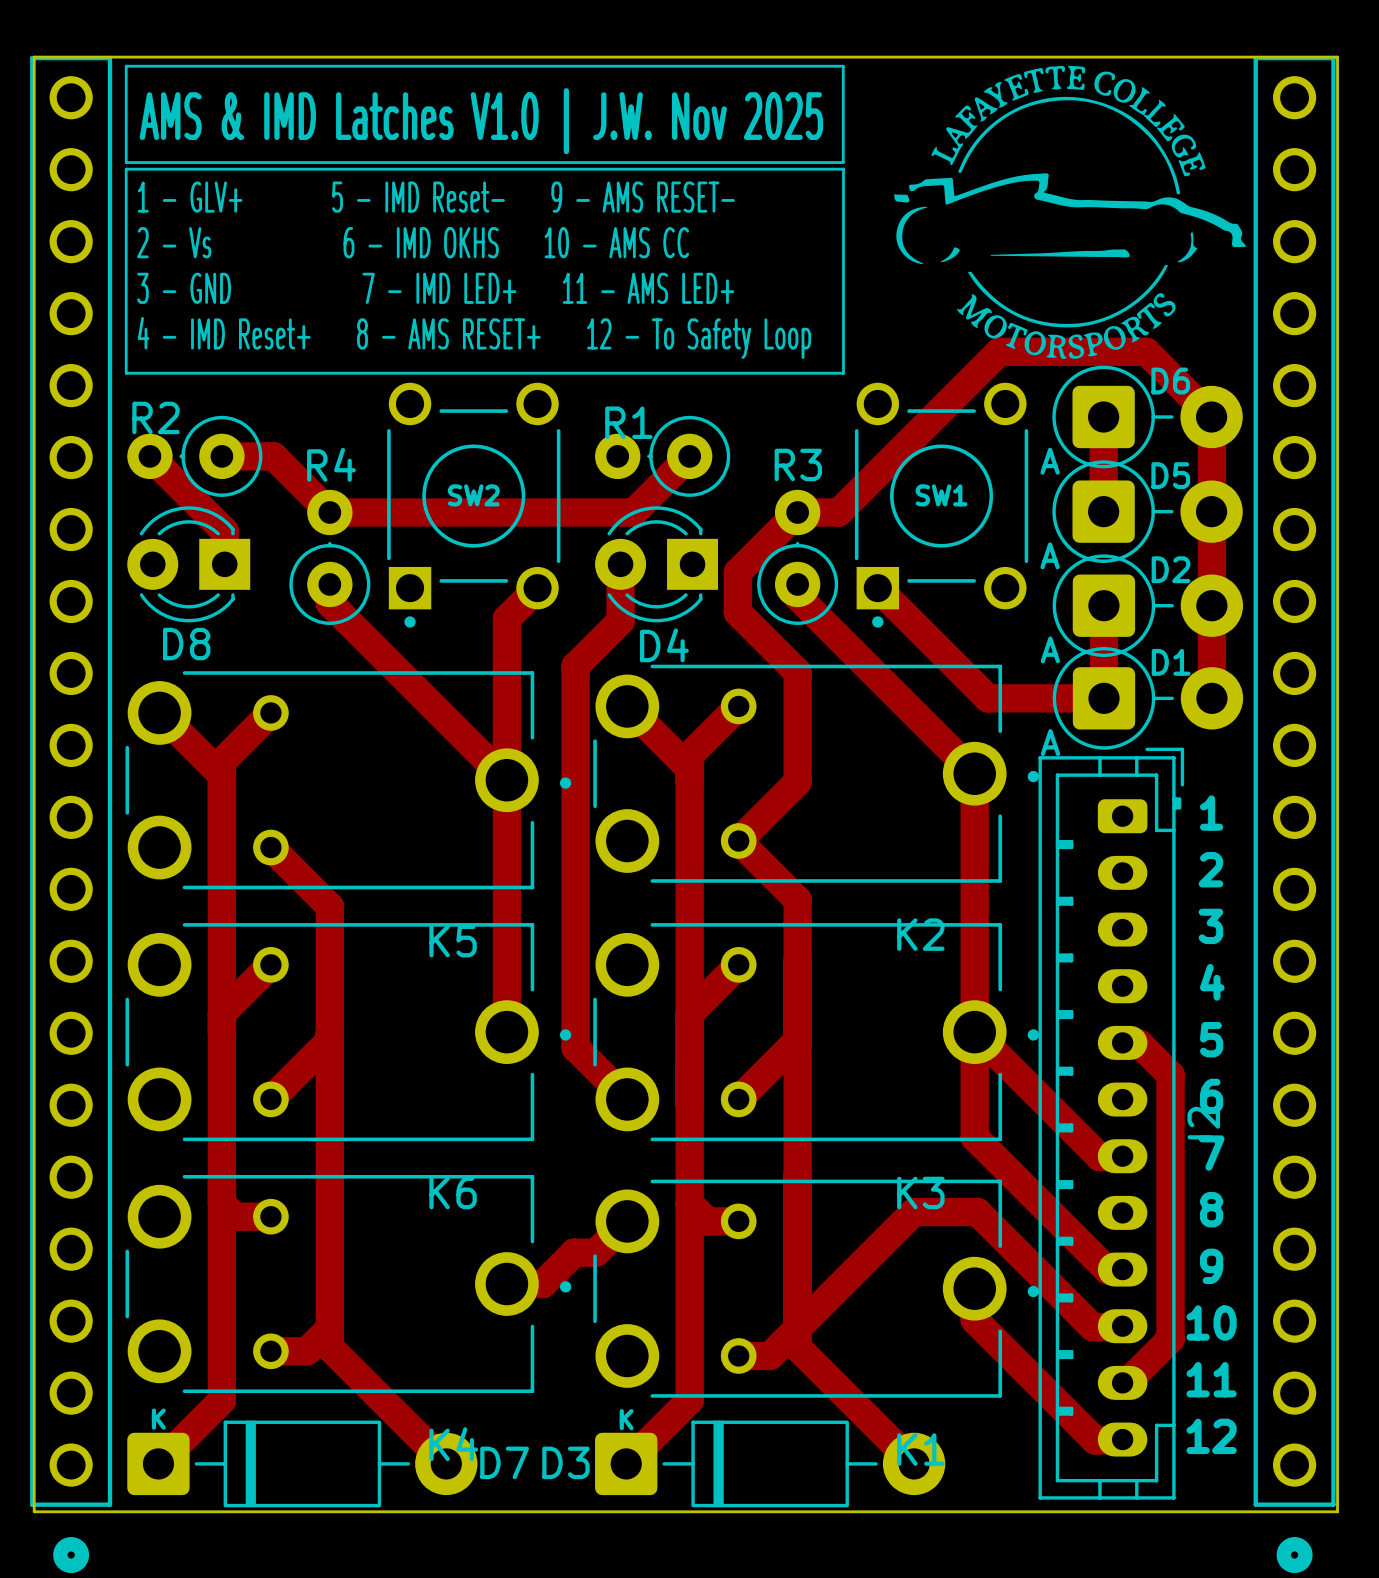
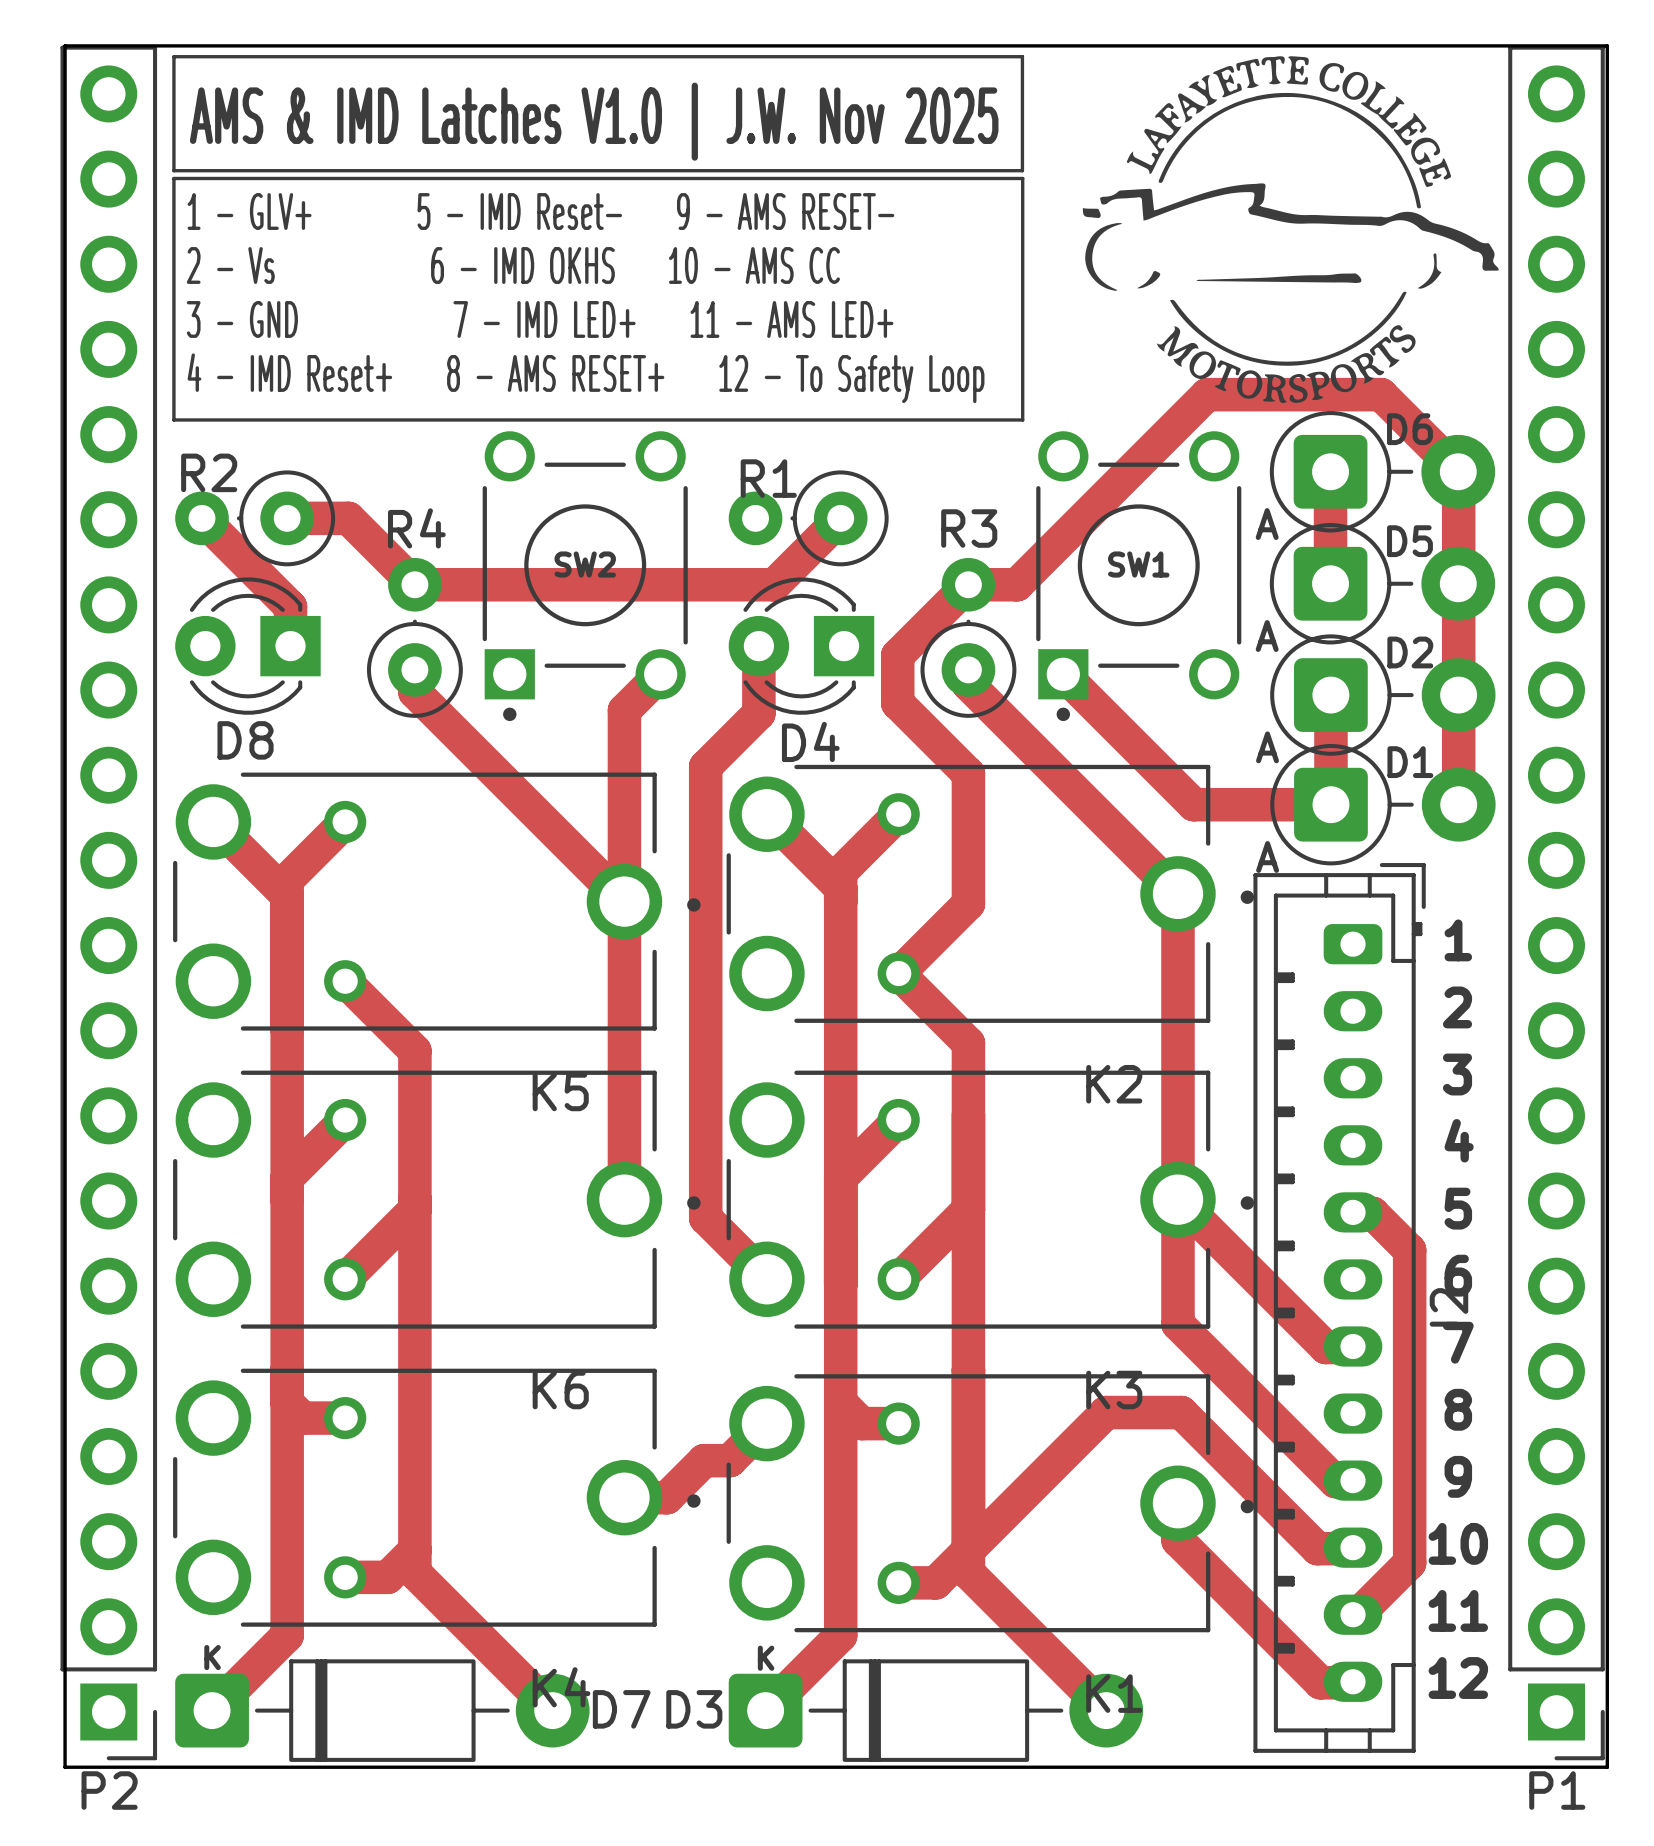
P2: none -> (108, 902)
P1: none -> (1556, 902)
part: (71, 814) -> none
part: (1294, 814) -> none

